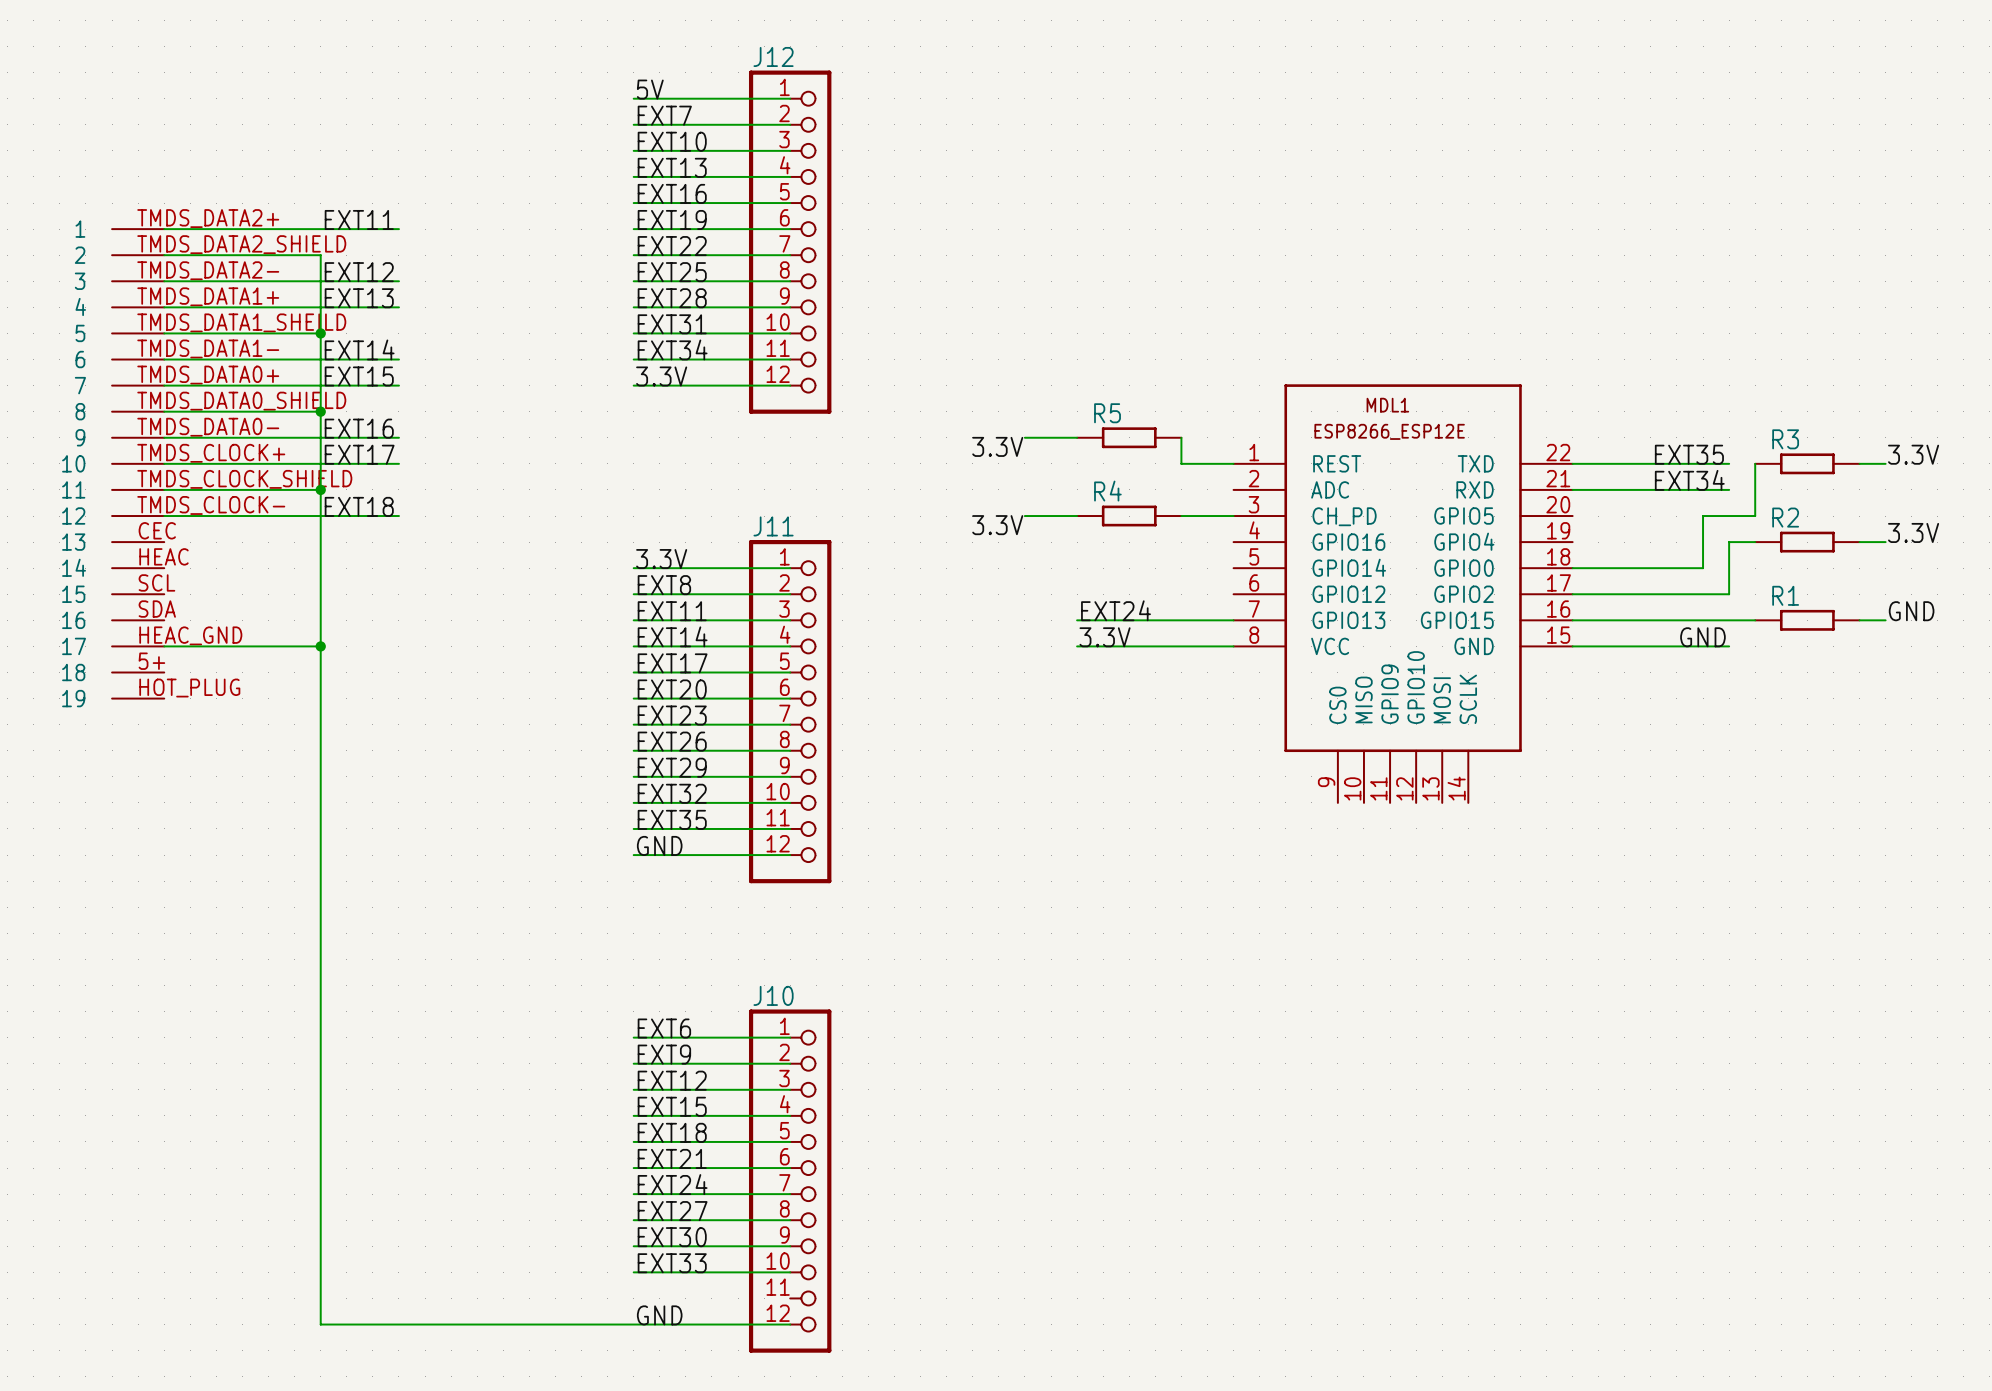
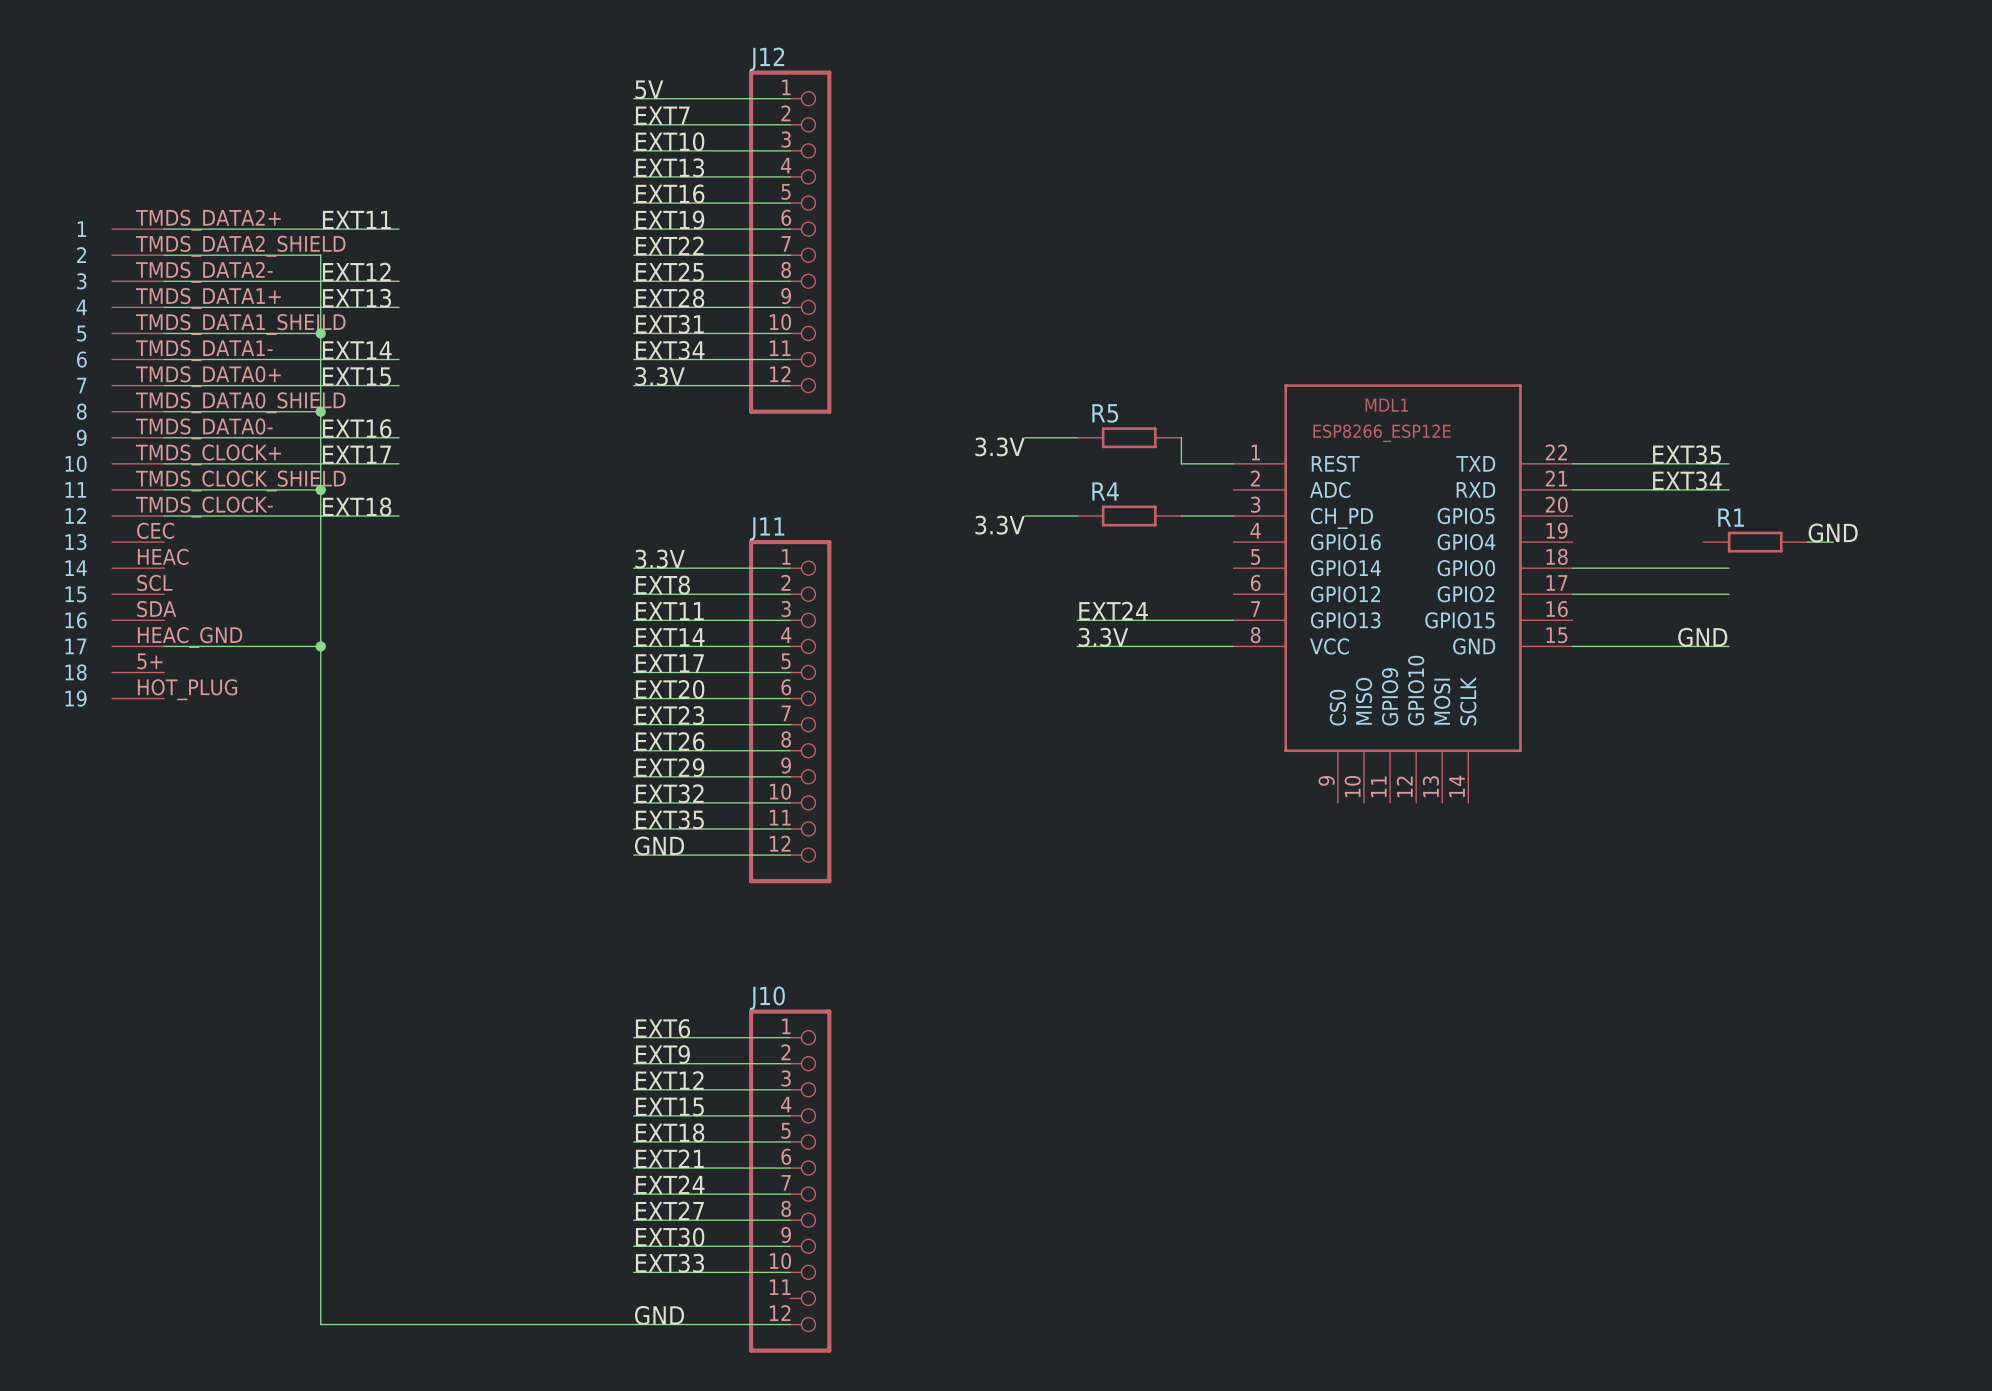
label: 3.3V (1913, 454) -> none
wire: (1755, 463) (1755, 516) (1703, 516) (1703, 568) -> (1729, 568) (1703, 568)
R3: (1807, 463) -> none
wire: (1859, 463) (1885, 463) -> none
label: 3.3V (1913, 532) -> none
wire: (1755, 542) (1729, 542) (1729, 594) -> none
R2: (1807, 542) -> none
wire: (1859, 542) (1885, 542) -> (1807, 542) (1833, 542)
label position: GND (1911, 611) -> GND (1833, 532)
wire: (1572, 620) (1755, 620) -> none
R1 position: (1807, 620) -> (1755, 542)
wire: (1859, 620) (1885, 620) -> none

